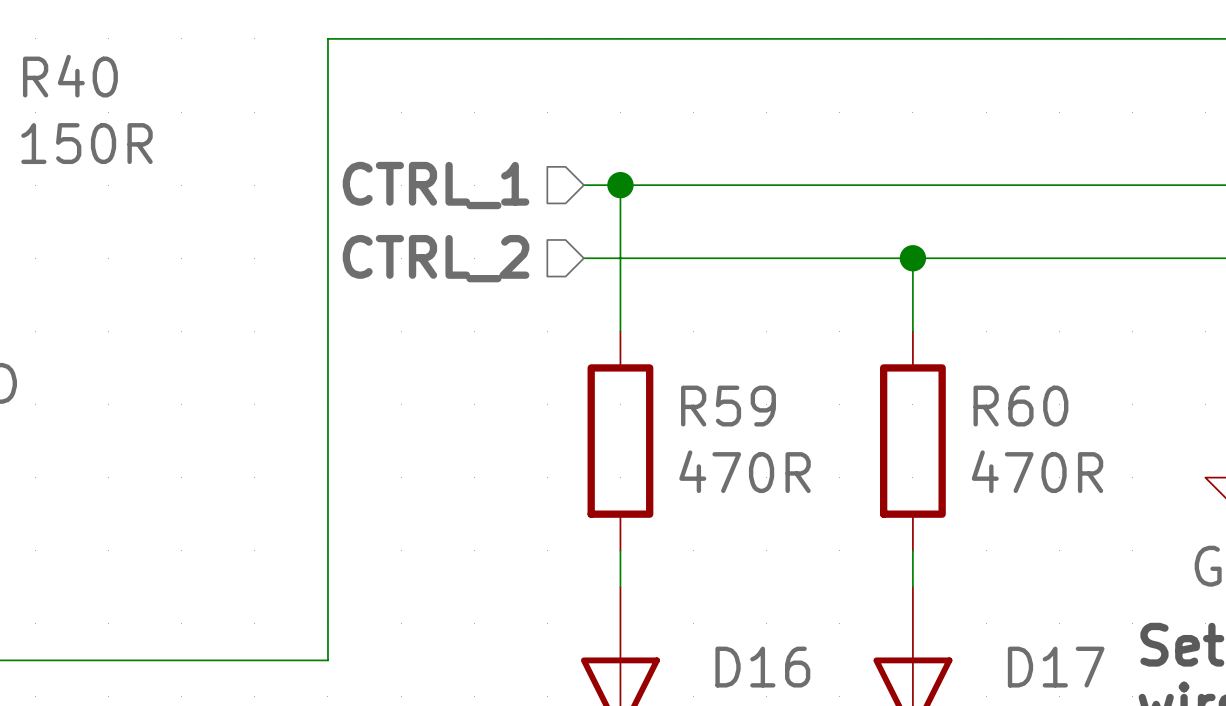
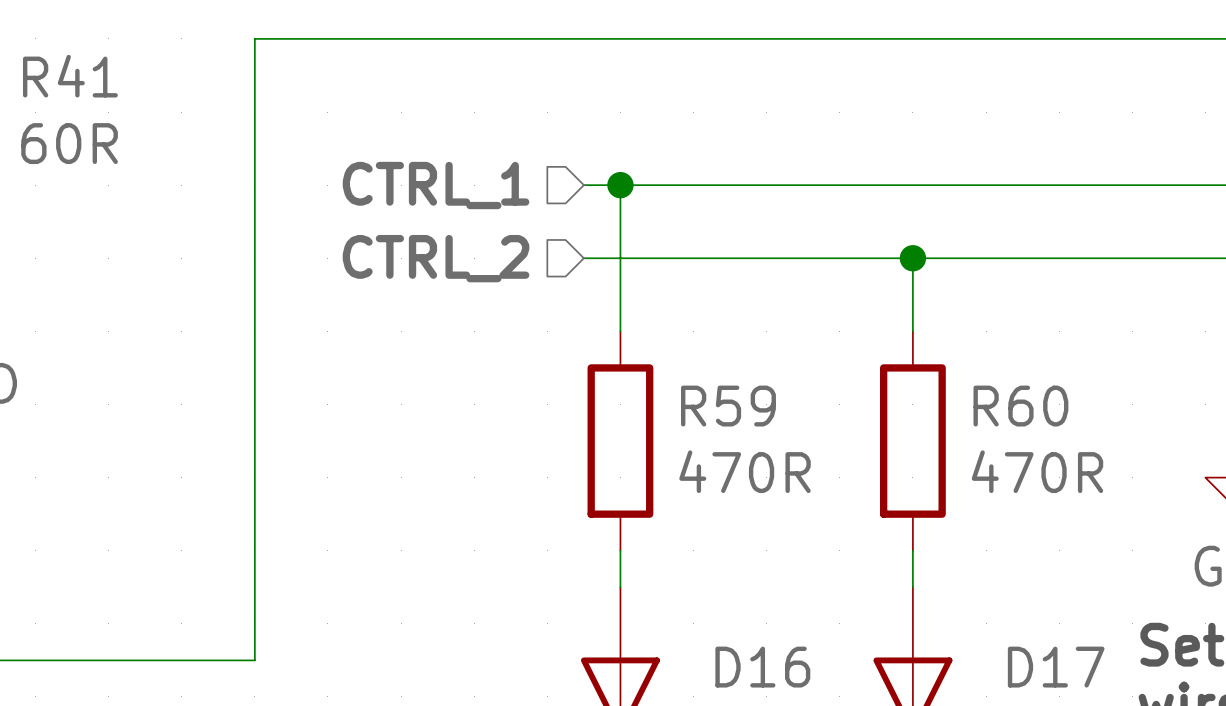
wire: (327, 38) (327, 660) (254, 660) -> (327, 38) (254, 38) (254, 660)
R40 name: R40 (70, 76) -> R41 (70, 76)
R40 value: 150R (86, 143) -> 60R (69, 143)

